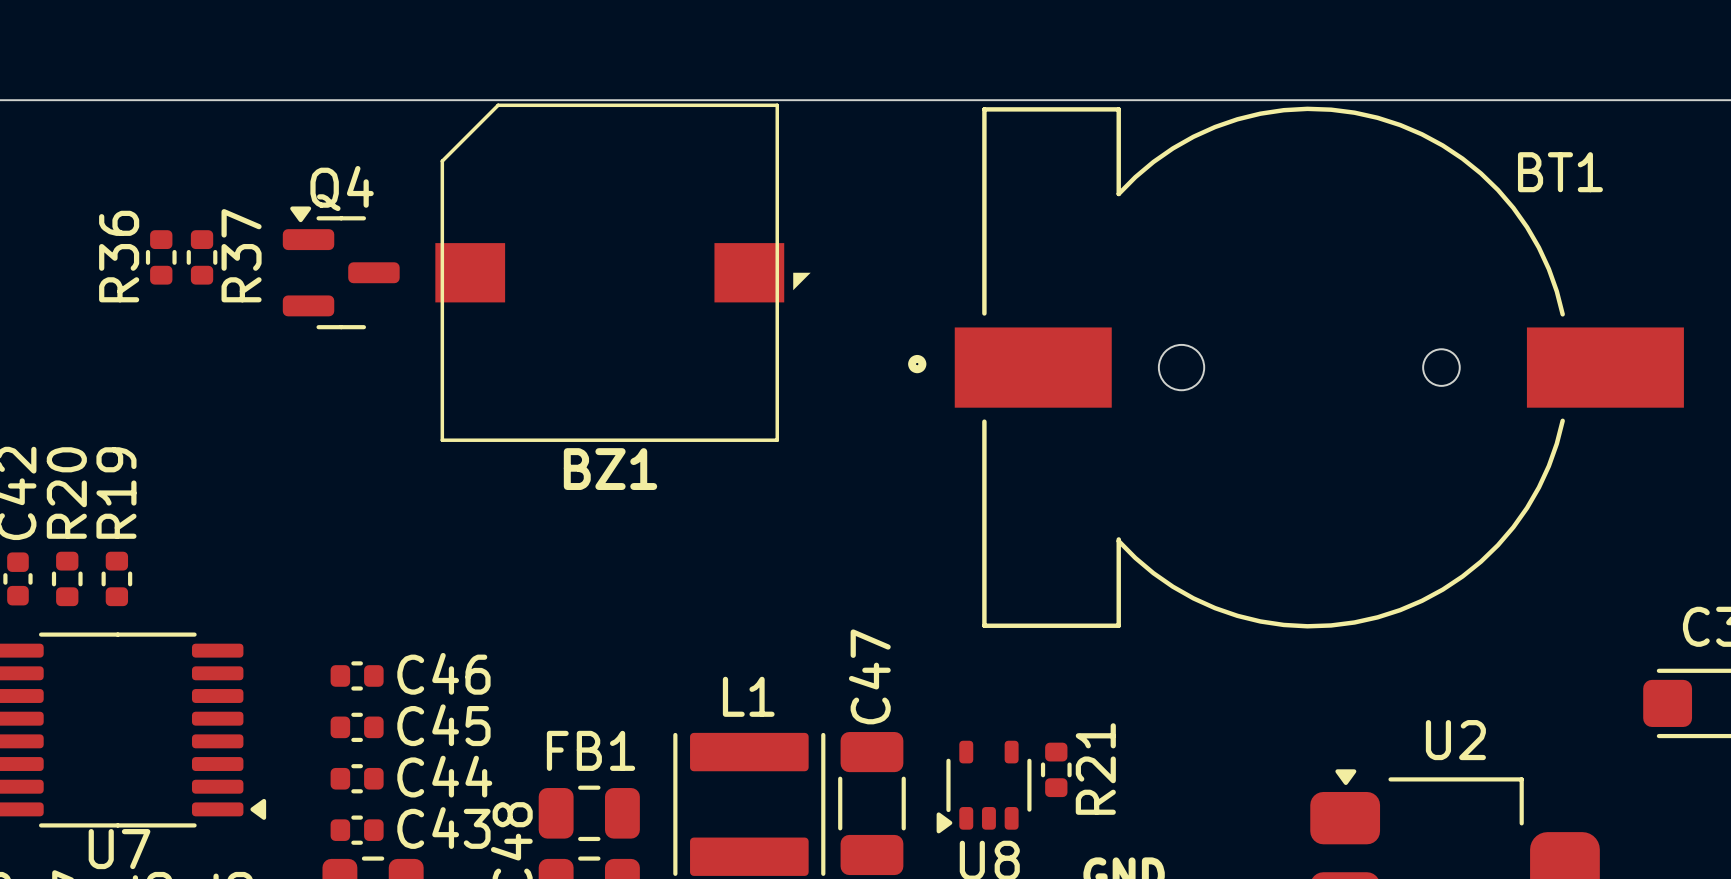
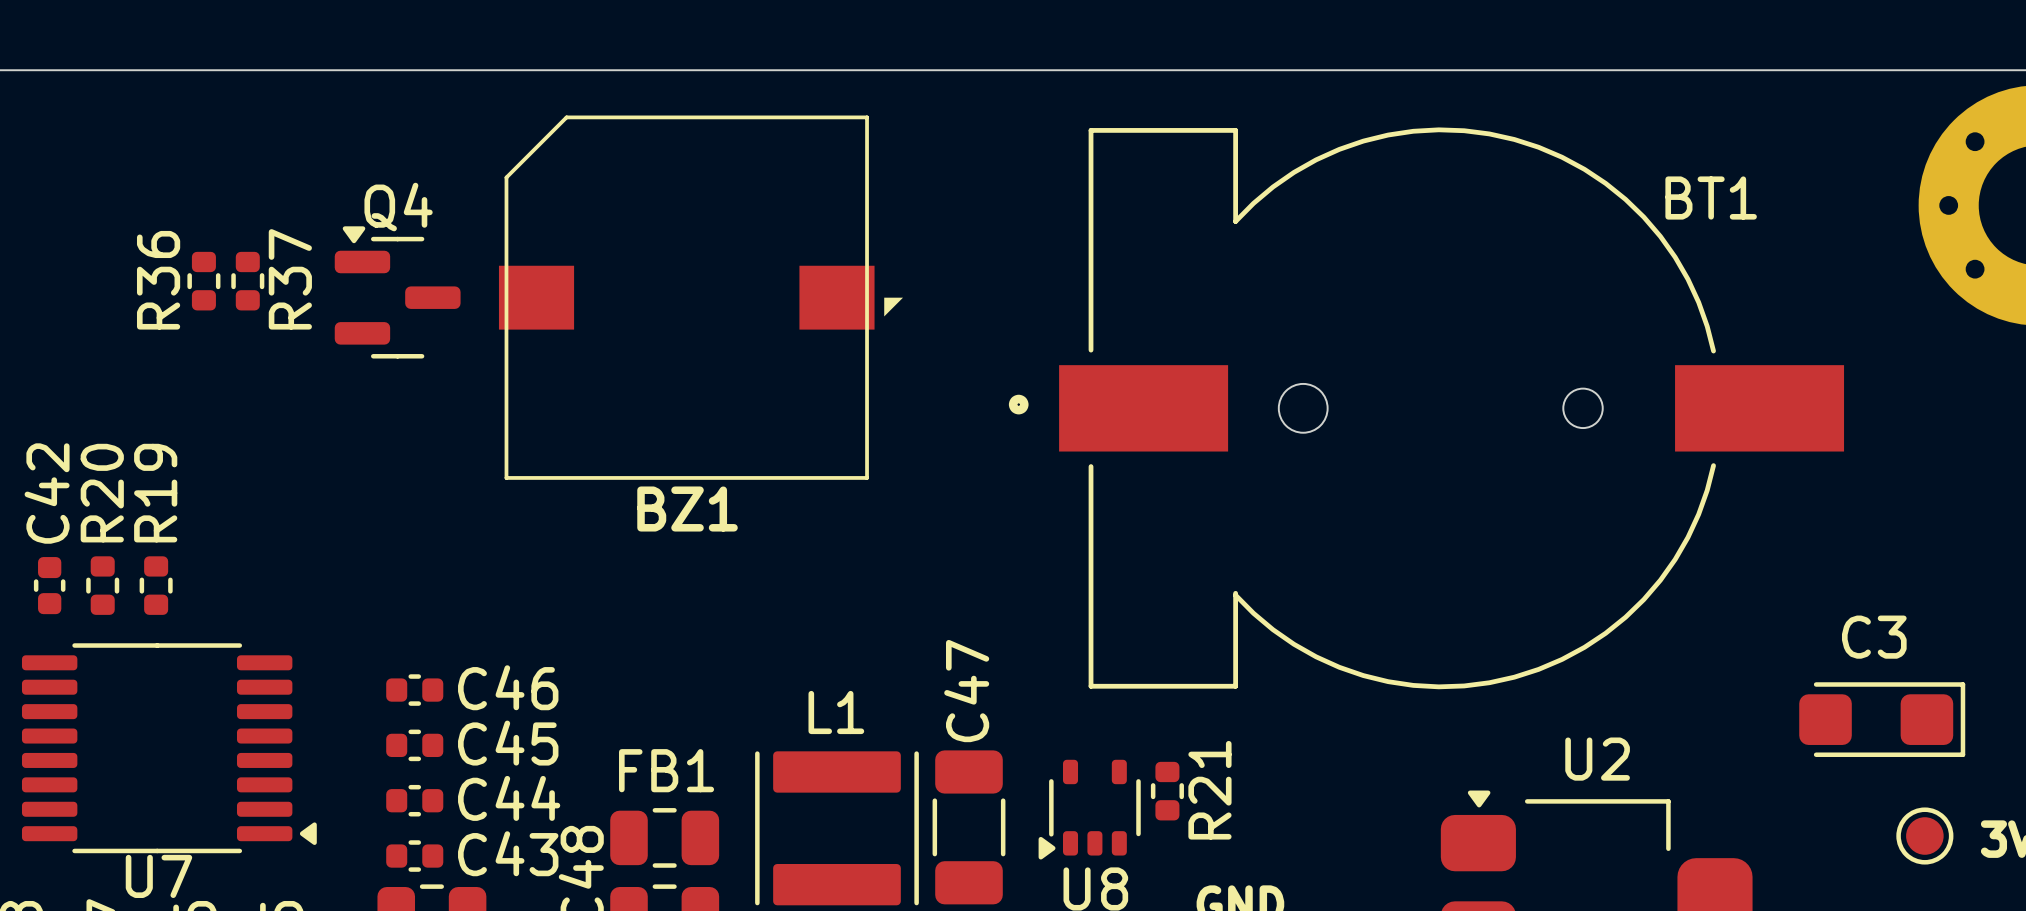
R36 position: (161, 257) -> (203, 281)
R37 position: (202, 257) -> (247, 281)
Q4 position: (341, 267) -> (397, 292)
BZ1 position: (623, 272) -> (700, 297)
BT1 position: (1296, 367) -> (1426, 408)

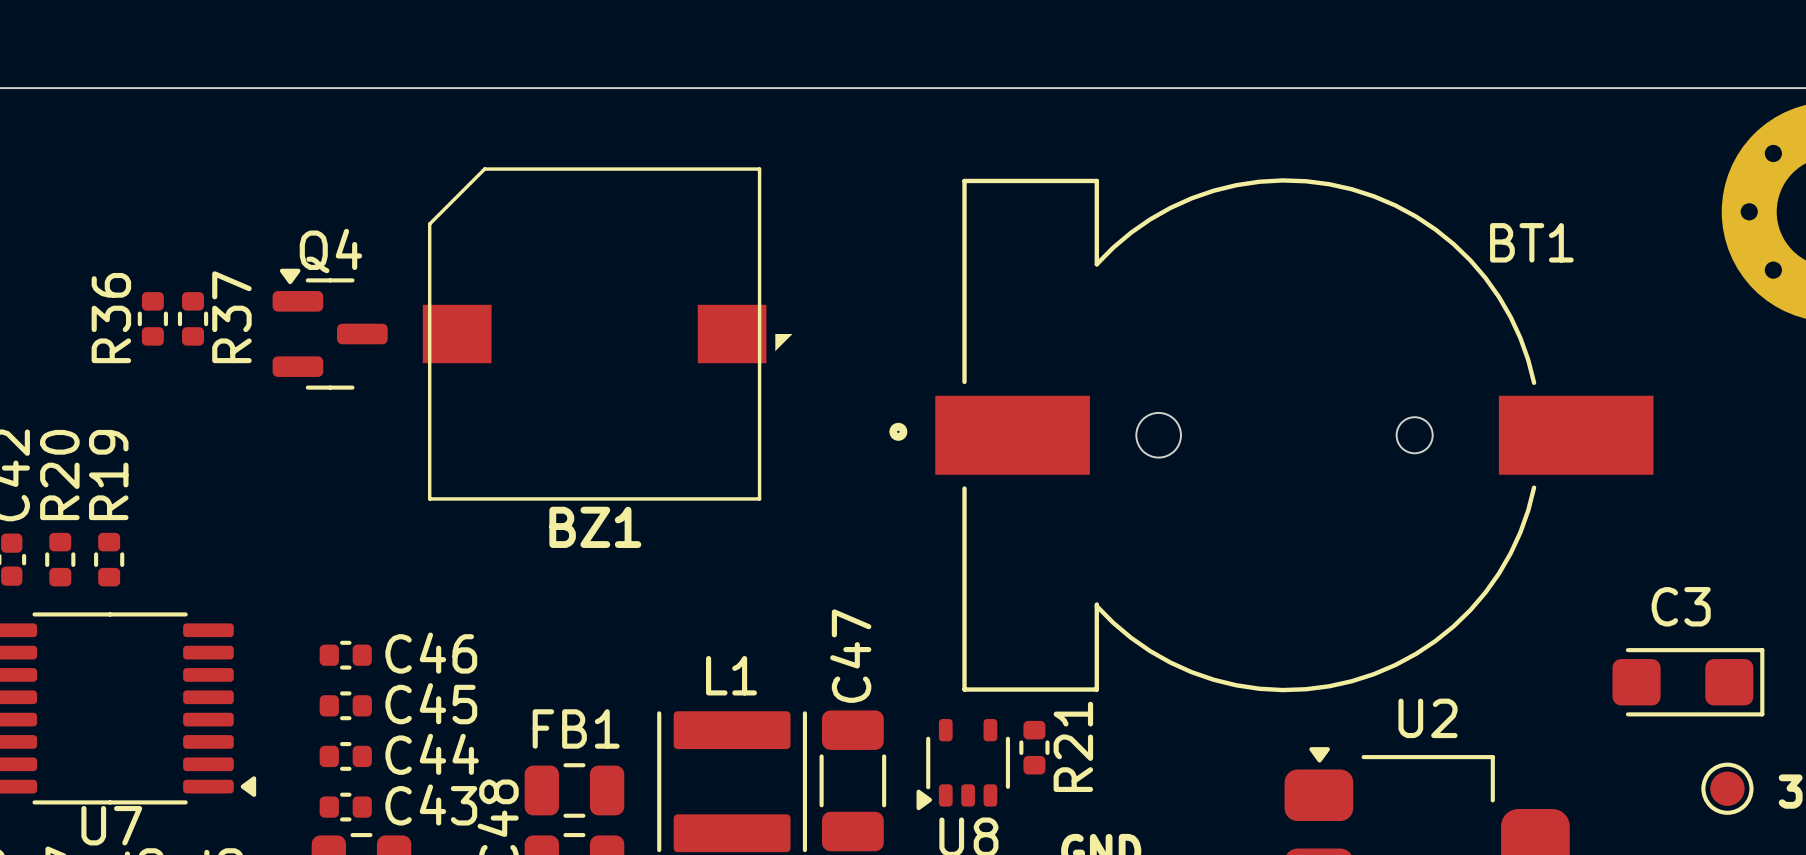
R36 position: (203, 281) -> (152, 318)
R37 position: (247, 281) -> (193, 318)
Q4 position: (397, 292) -> (330, 329)
BZ1 position: (700, 297) -> (607, 334)
BT1 position: (1426, 408) -> (1271, 435)

